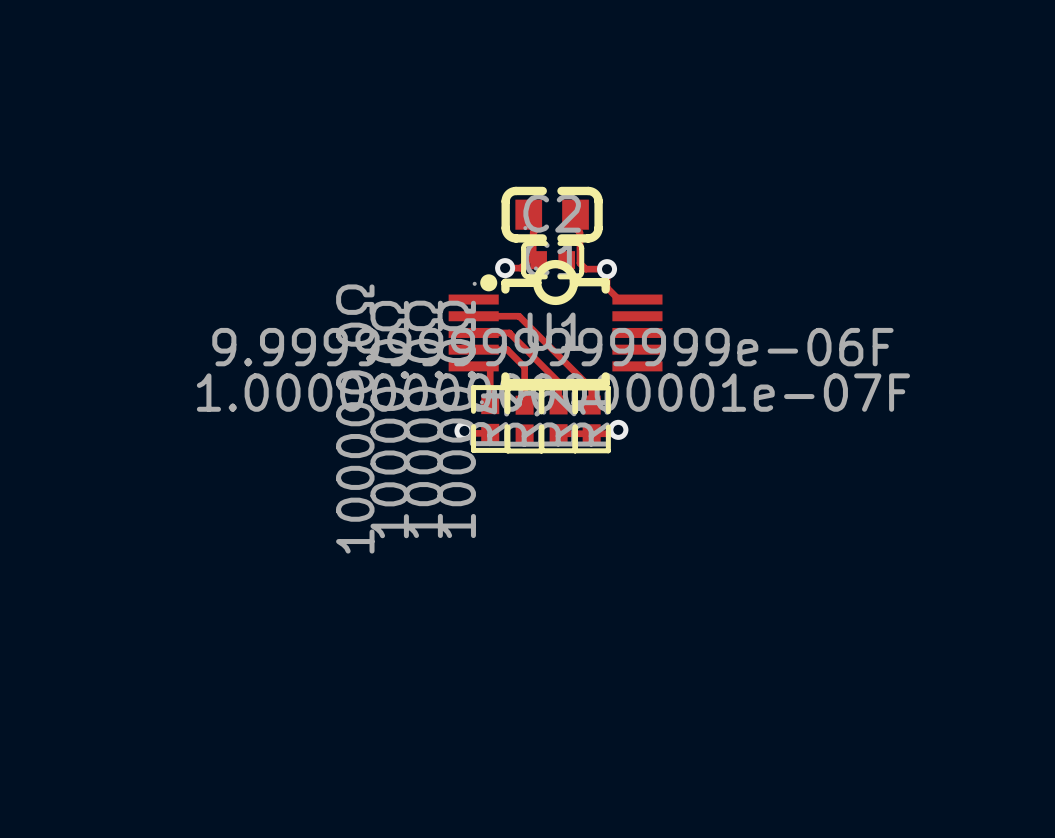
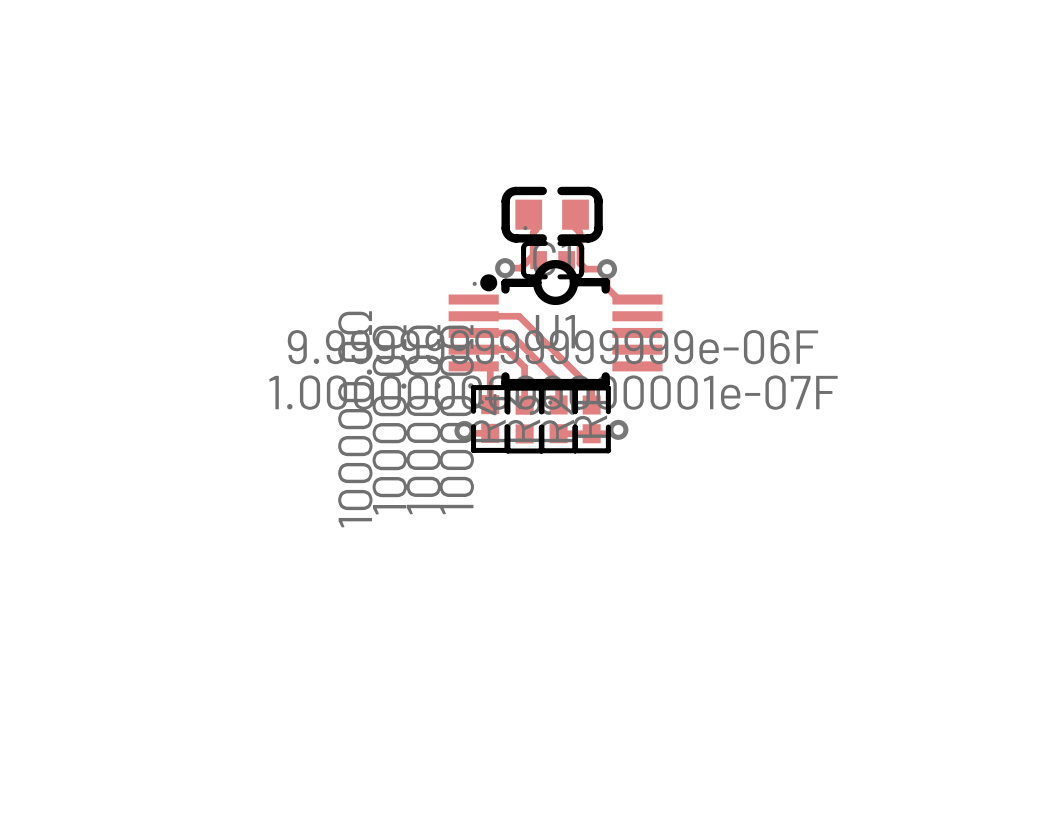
C2 name: C2 (552, 213) -> none

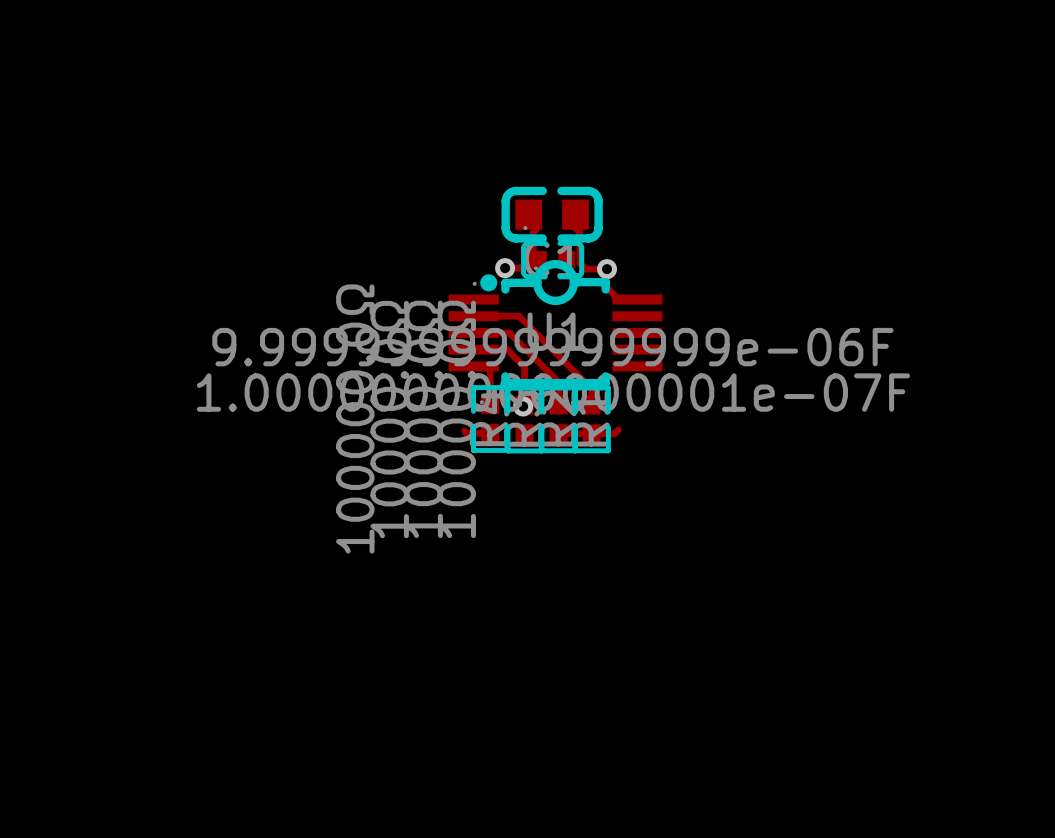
via: none -> (523, 406)
via: (618, 429) -> none
via: (464, 430) -> none

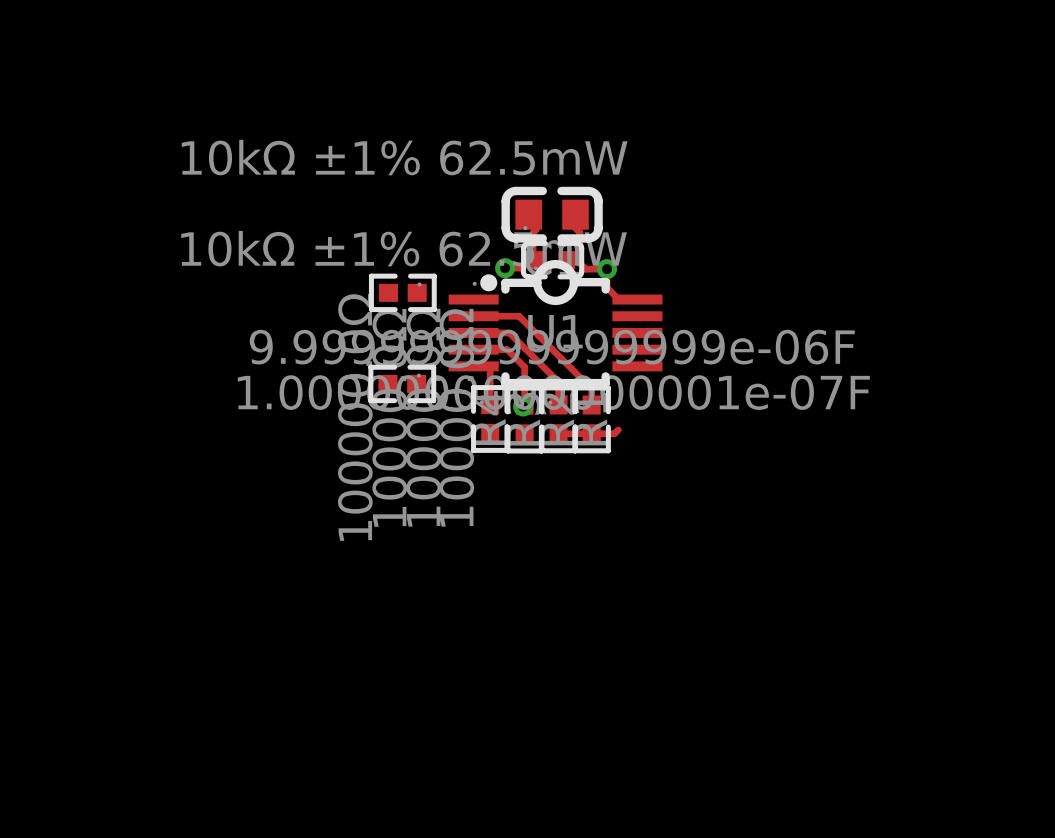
part: none -> 10kΩ ±1% 62.5mW (402, 292)
part: none -> 10kΩ ±1% 62.5mW (402, 383)
top track: (464, 430) (466, 433) (490, 433) -> none

